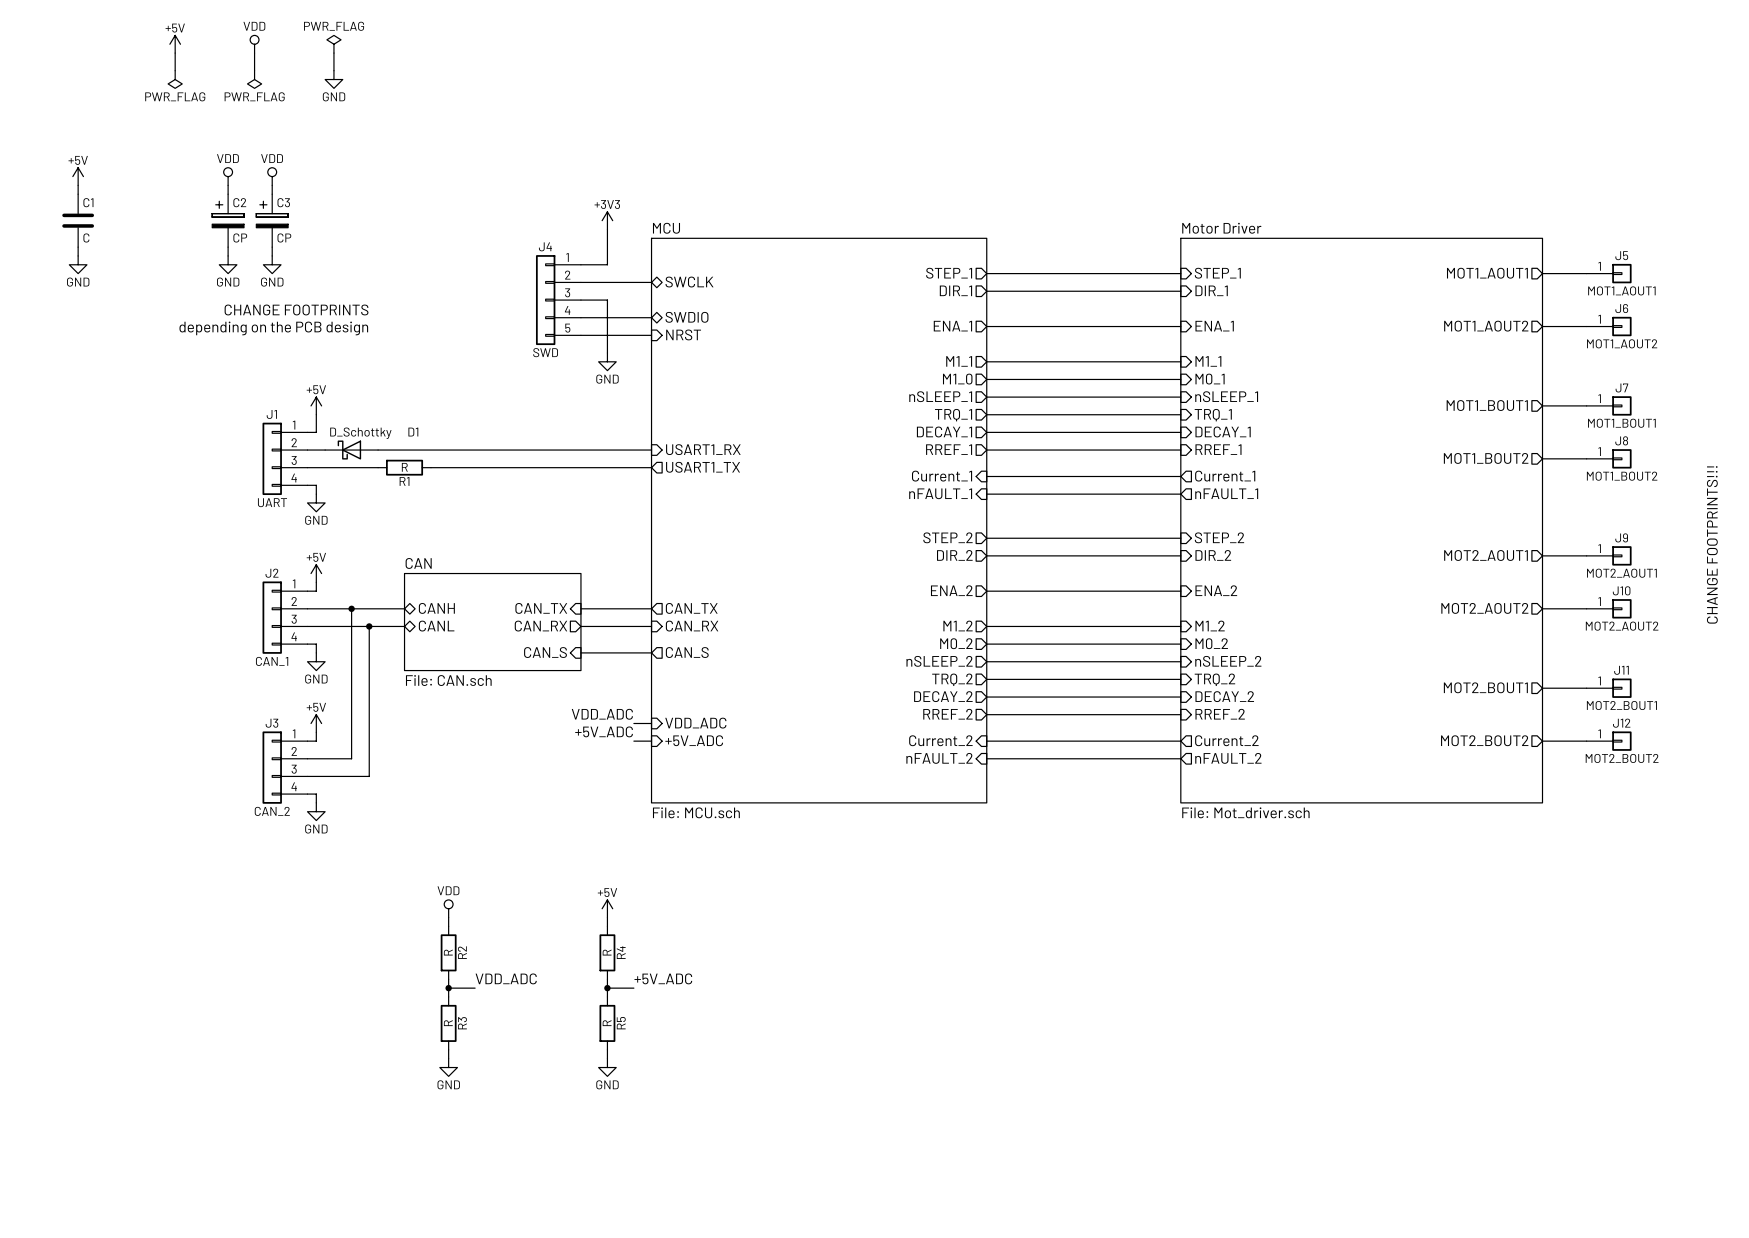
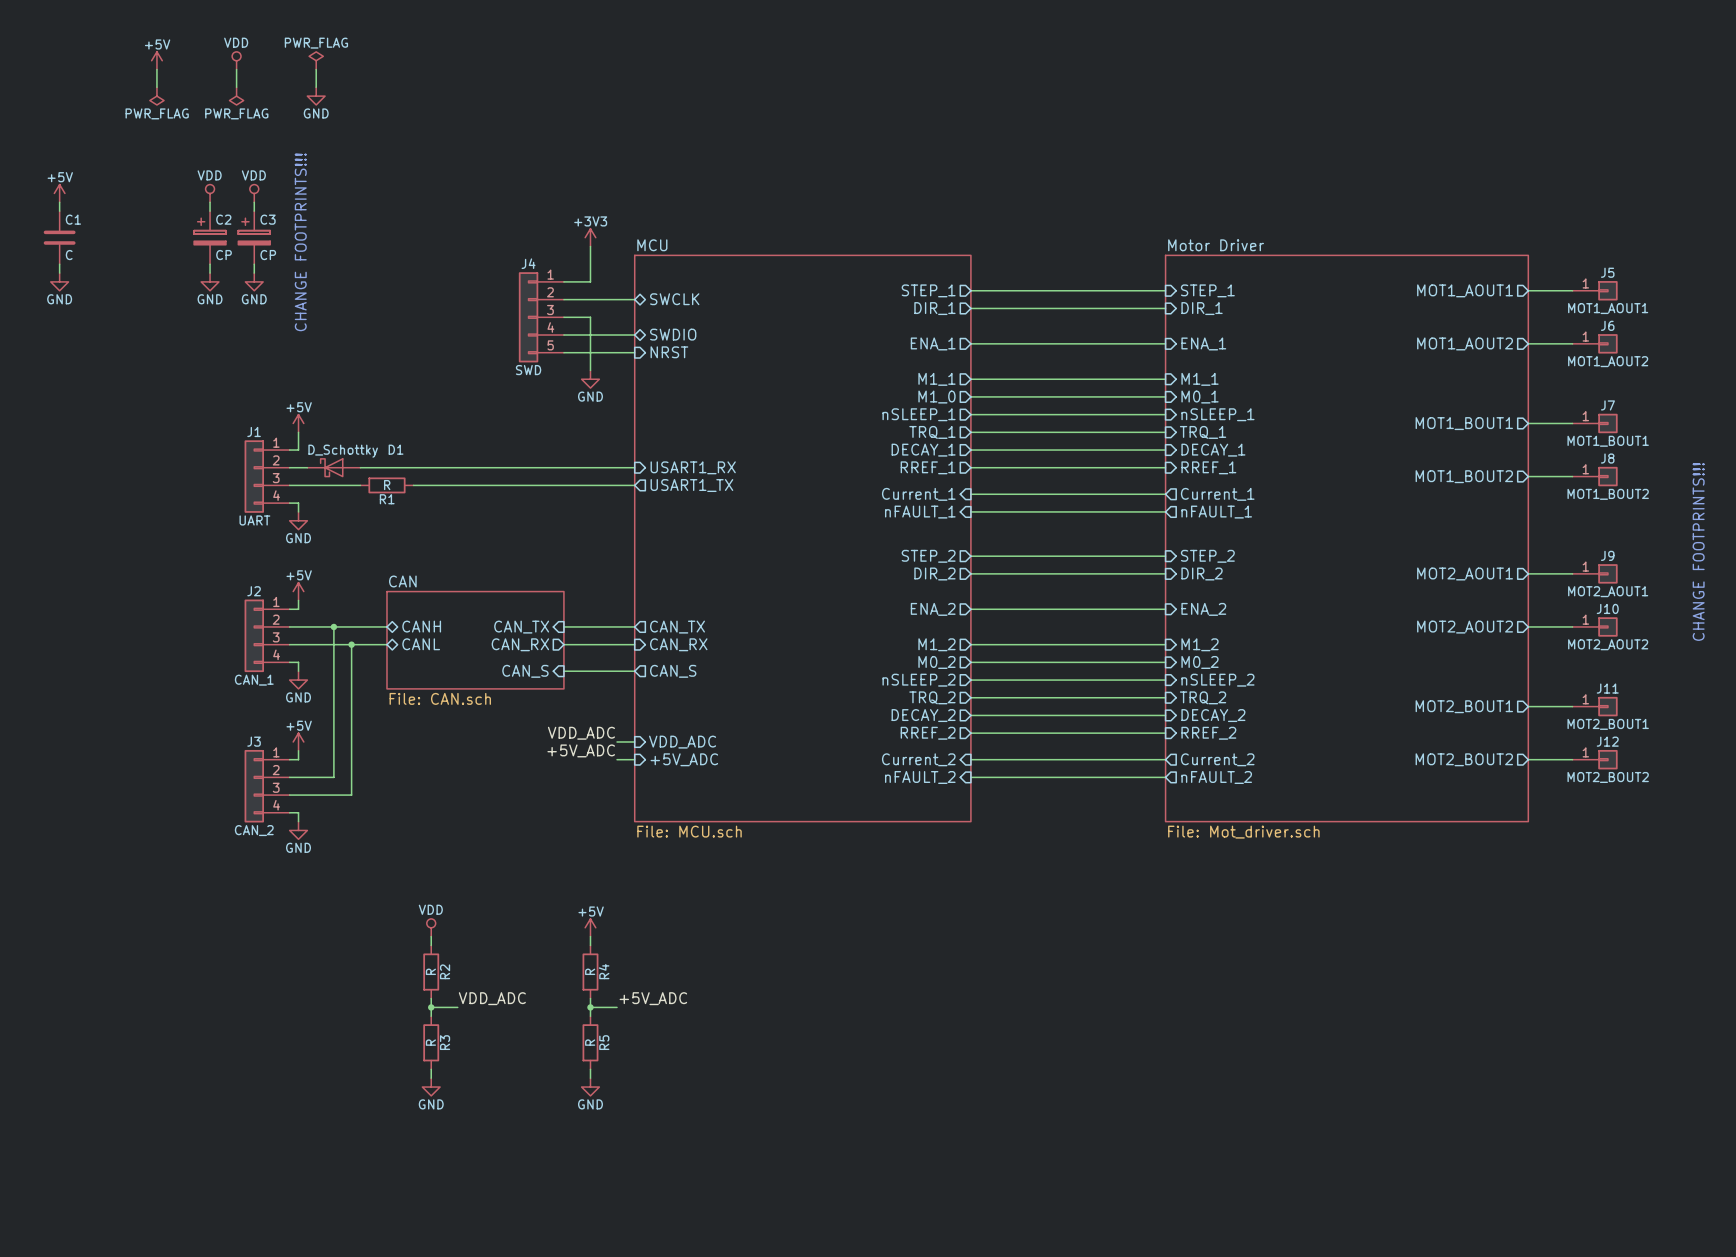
text: CHANGE FOOTPRINTS (296, 309) -> CHANGE FOOTPRINTS!!! (300, 242)
text: depending on the PCB design (273, 328) -> none

